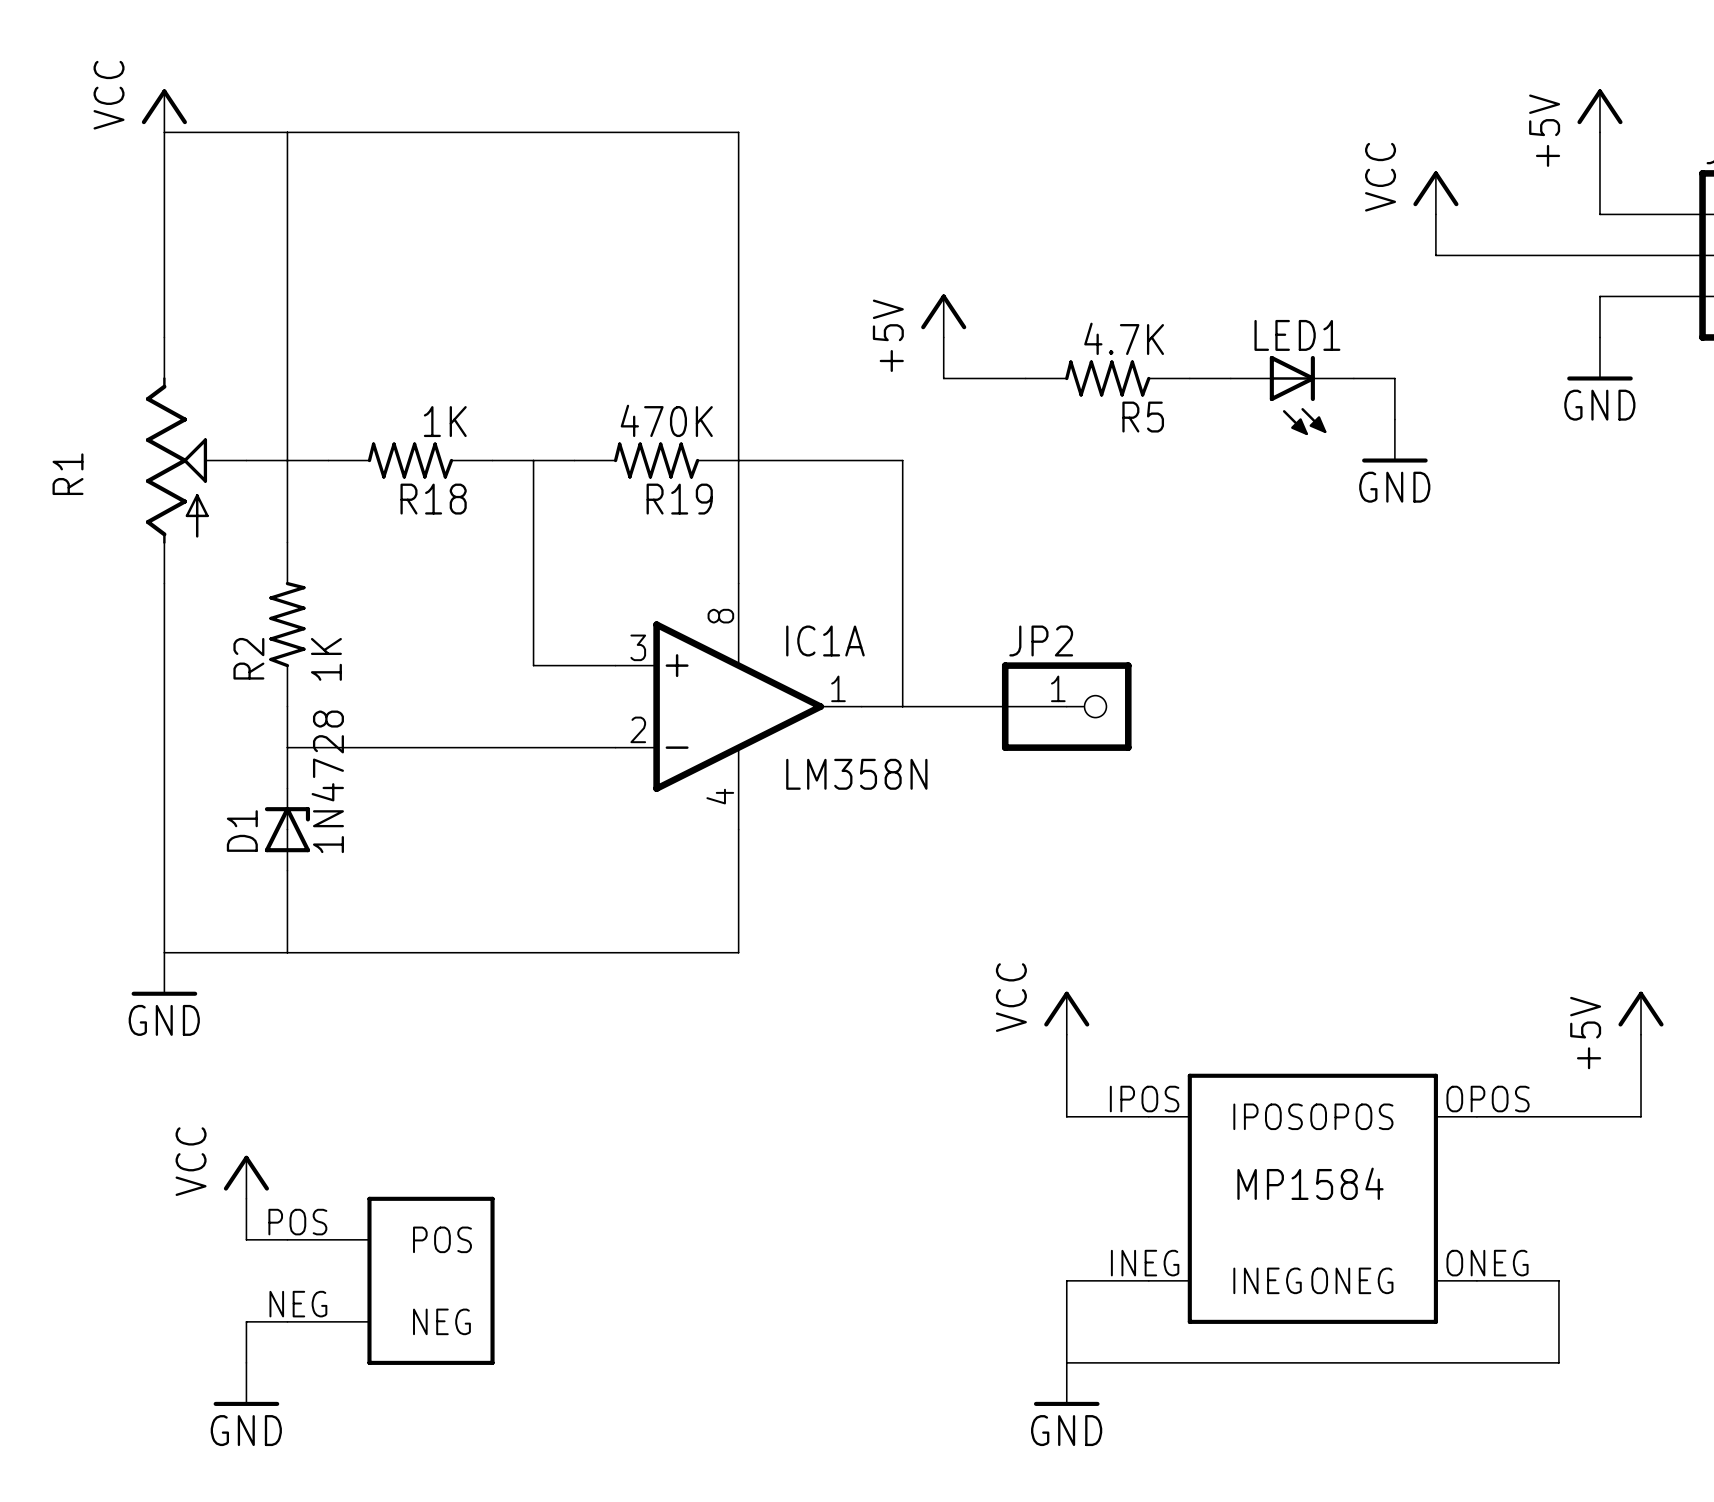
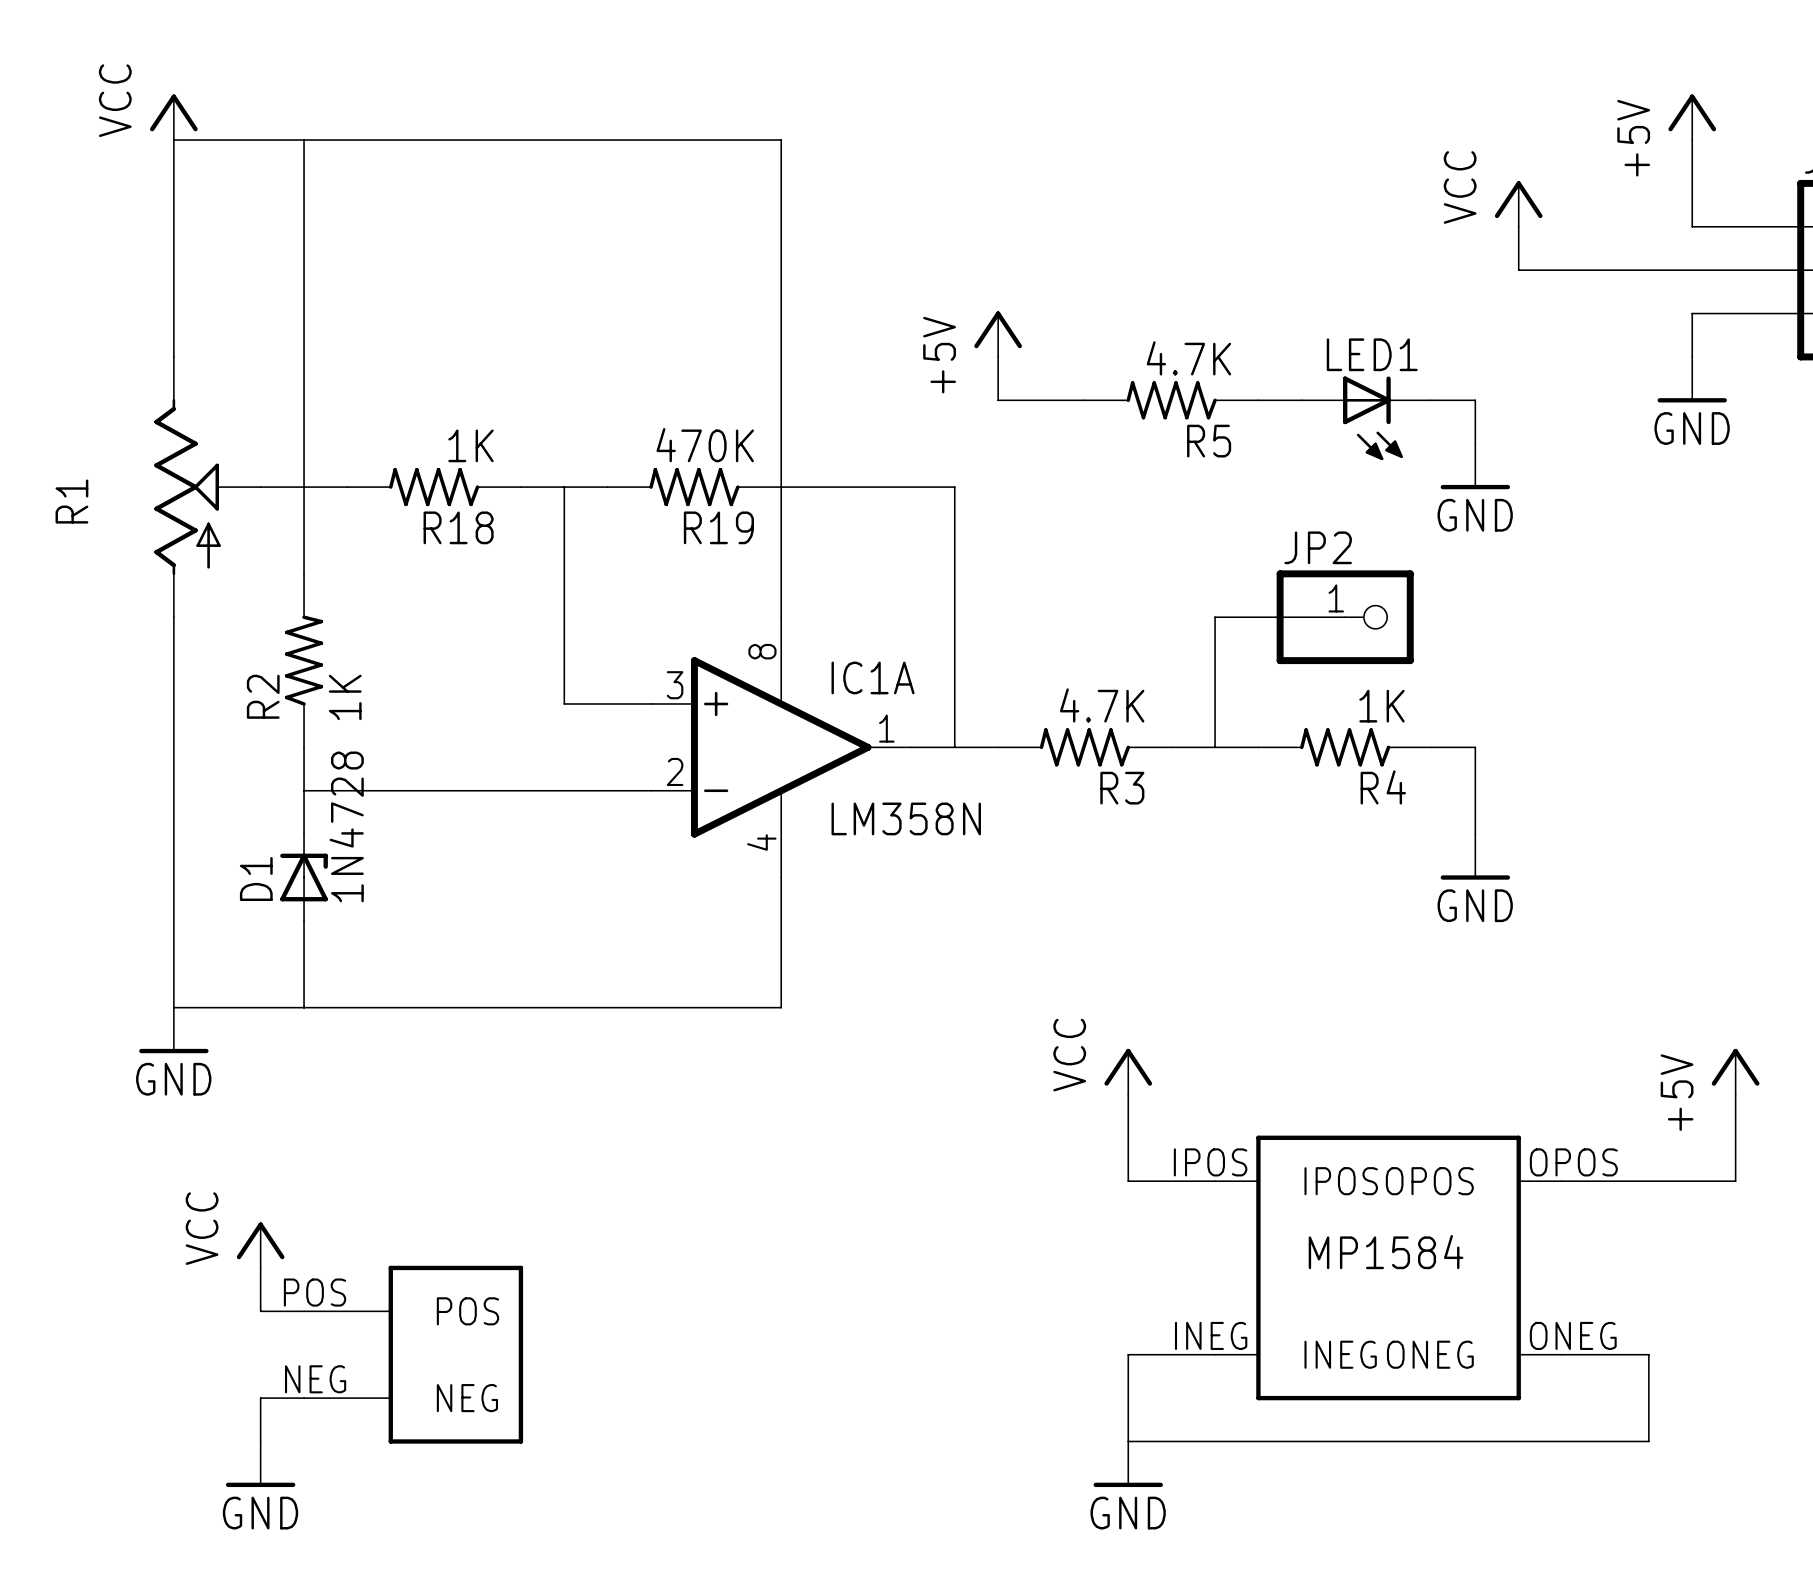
wire: none -> (1345, 617) (1215, 617) (1215, 747)
R3: none -> 4.7K (1084, 747)
JP2 position: (1066, 706) -> (1345, 617)
wire: none -> (1171, 747) (1258, 747)
R4: none -> 1K (1345, 747)
wire: none -> (1431, 747) (1475, 747) (1475, 834)
power symbol: none -> GND (1475, 856)

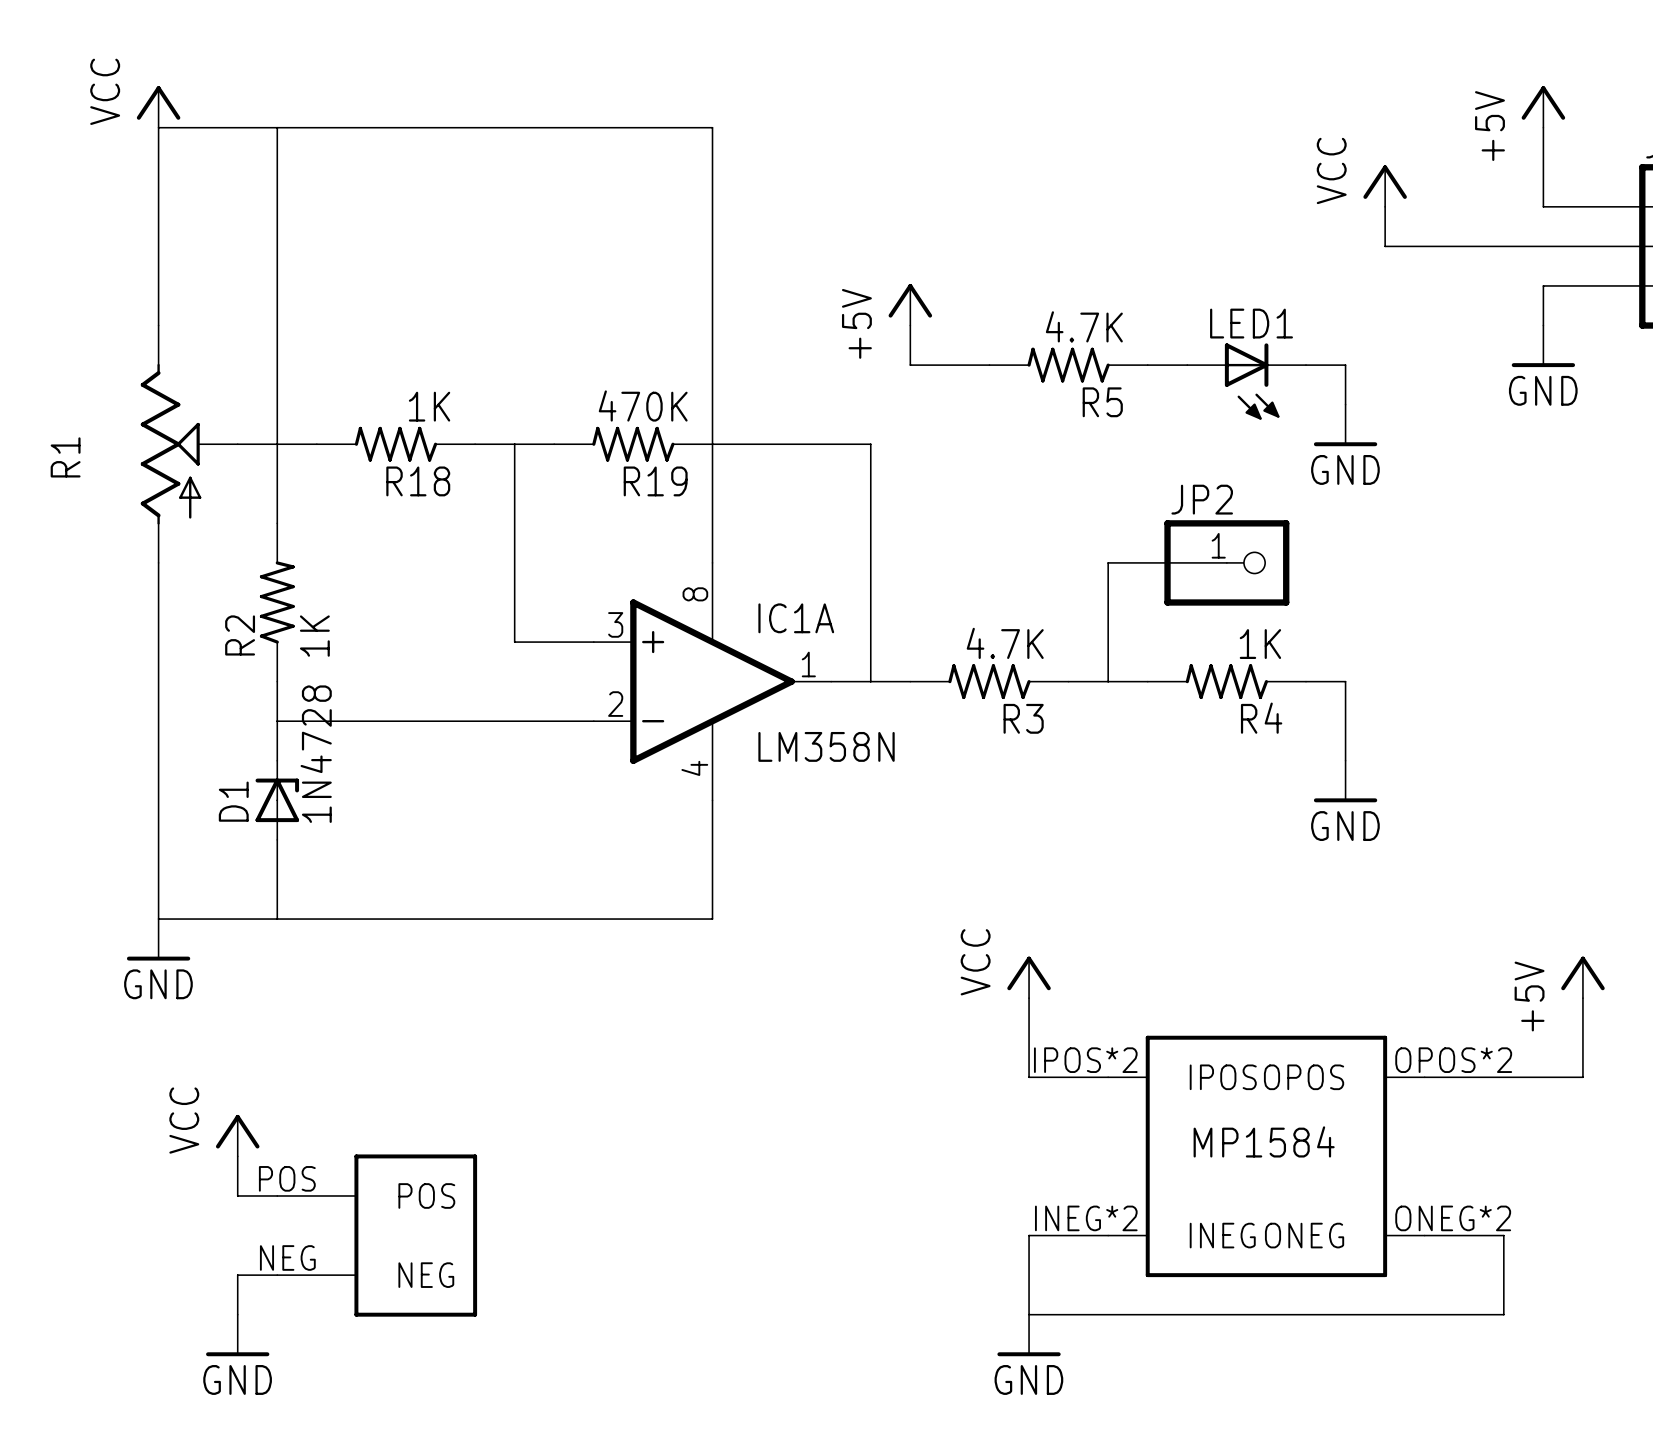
part pin number: IPOS (1210, 1162) -> IPOS*2 (1085, 1060)
part pin number: OPOS (1573, 1162) -> OPOS*2 (1453, 1060)
part pin number: INEG (1211, 1335) -> INEG*2 (1086, 1218)
part pin number: ONEG (1573, 1335) -> ONEG*2 (1453, 1218)

